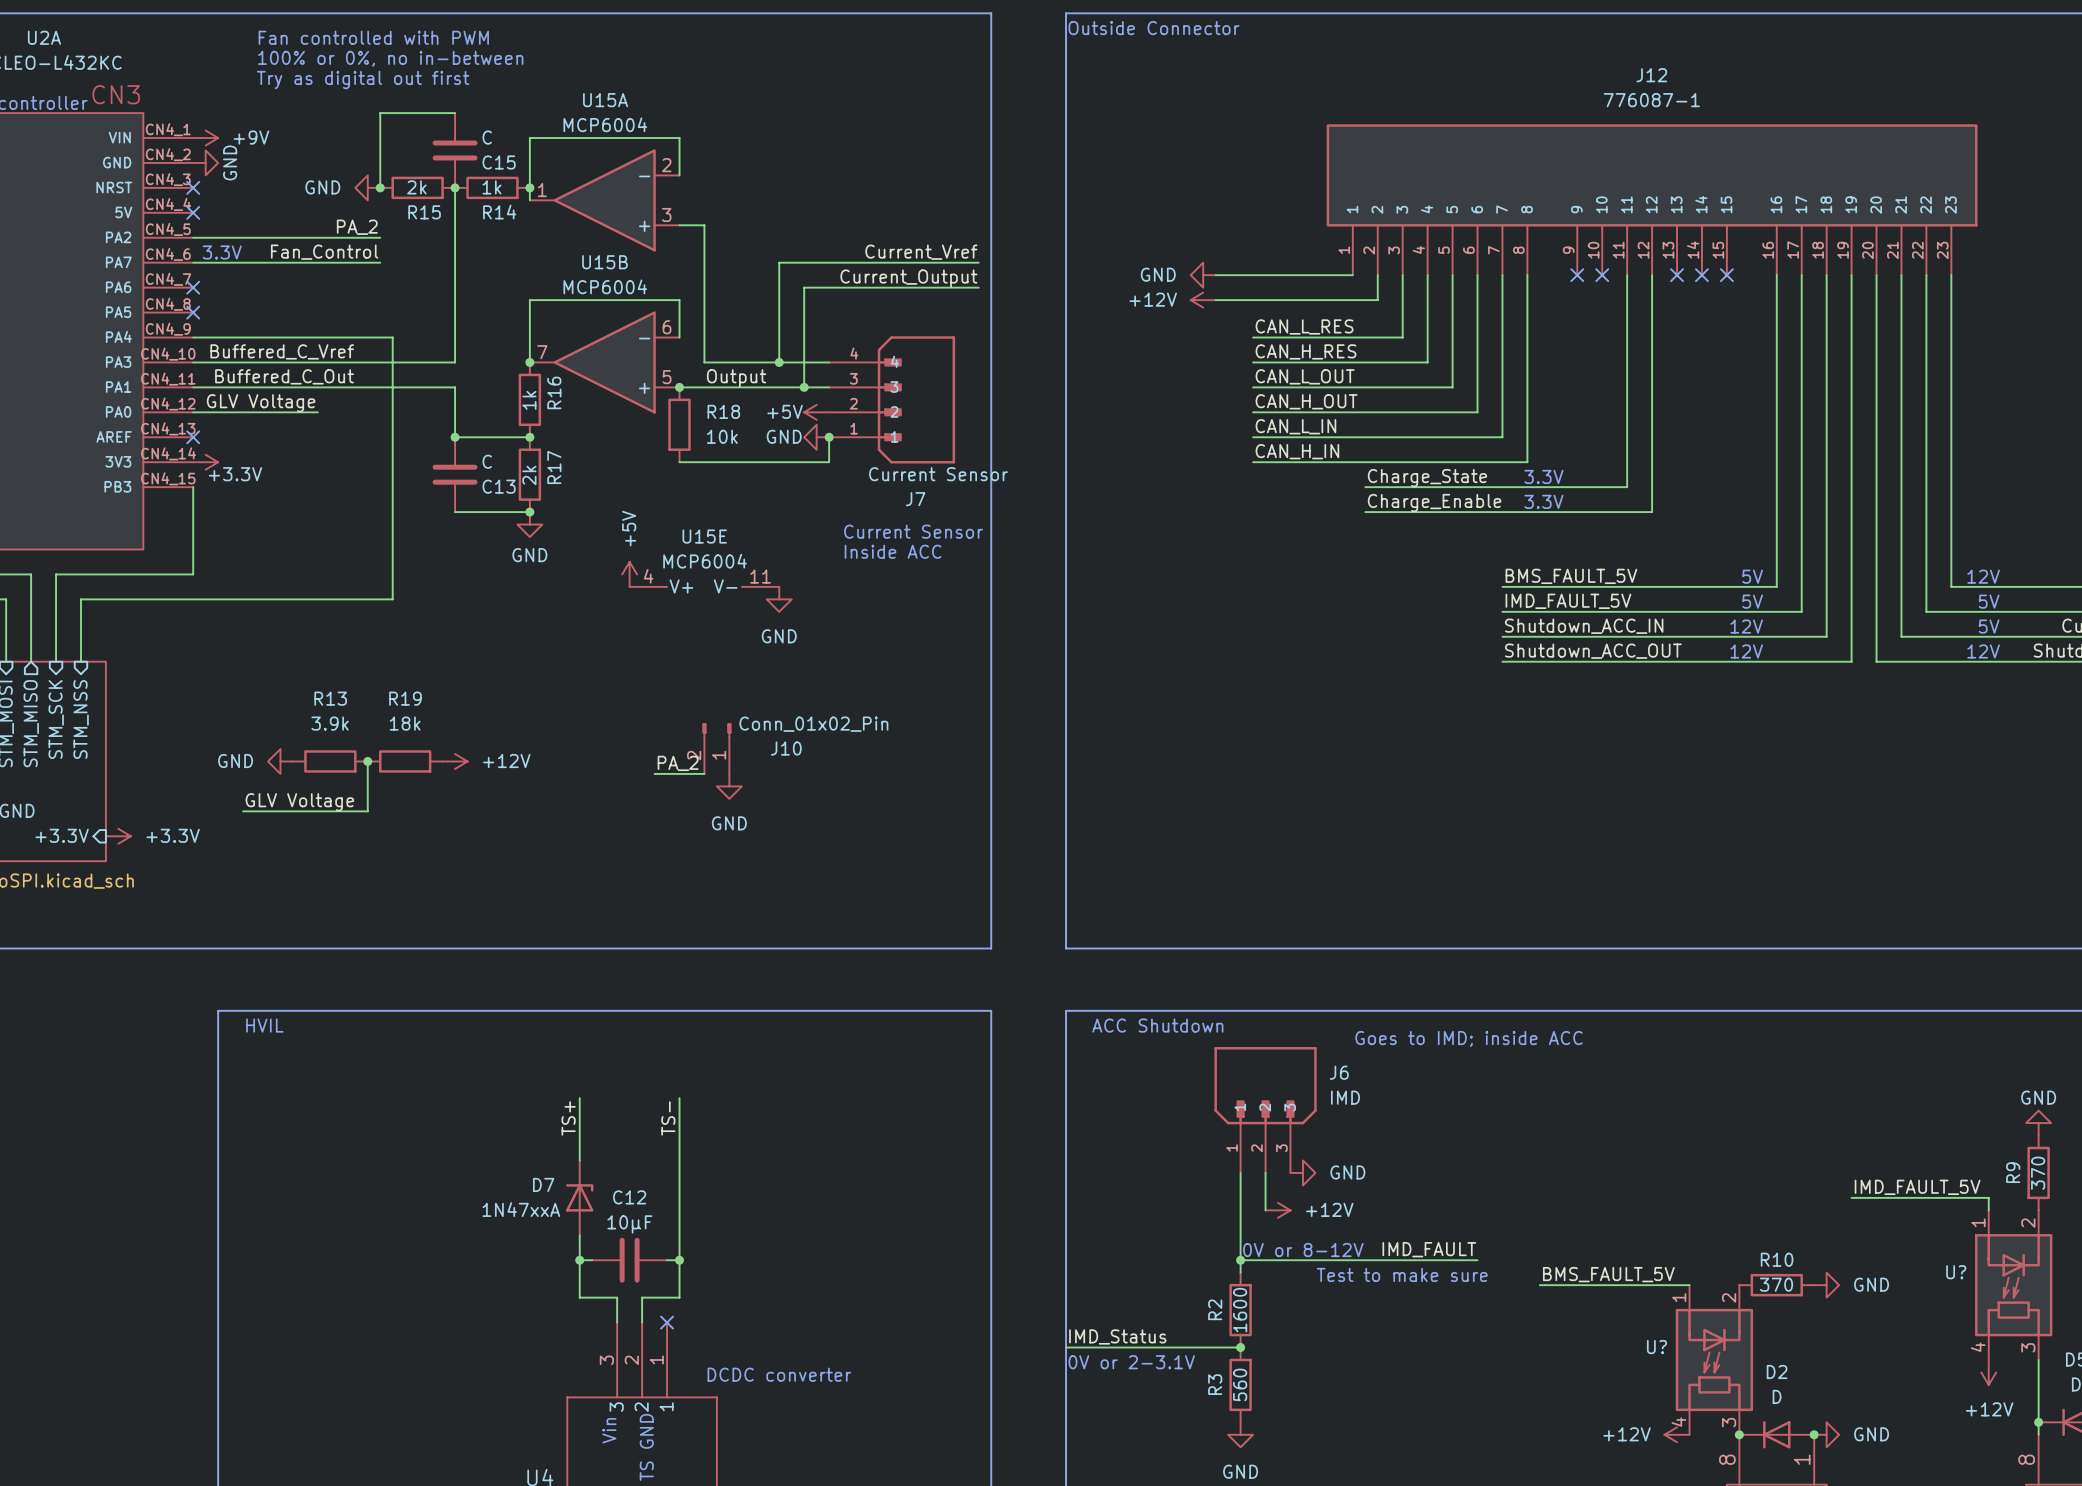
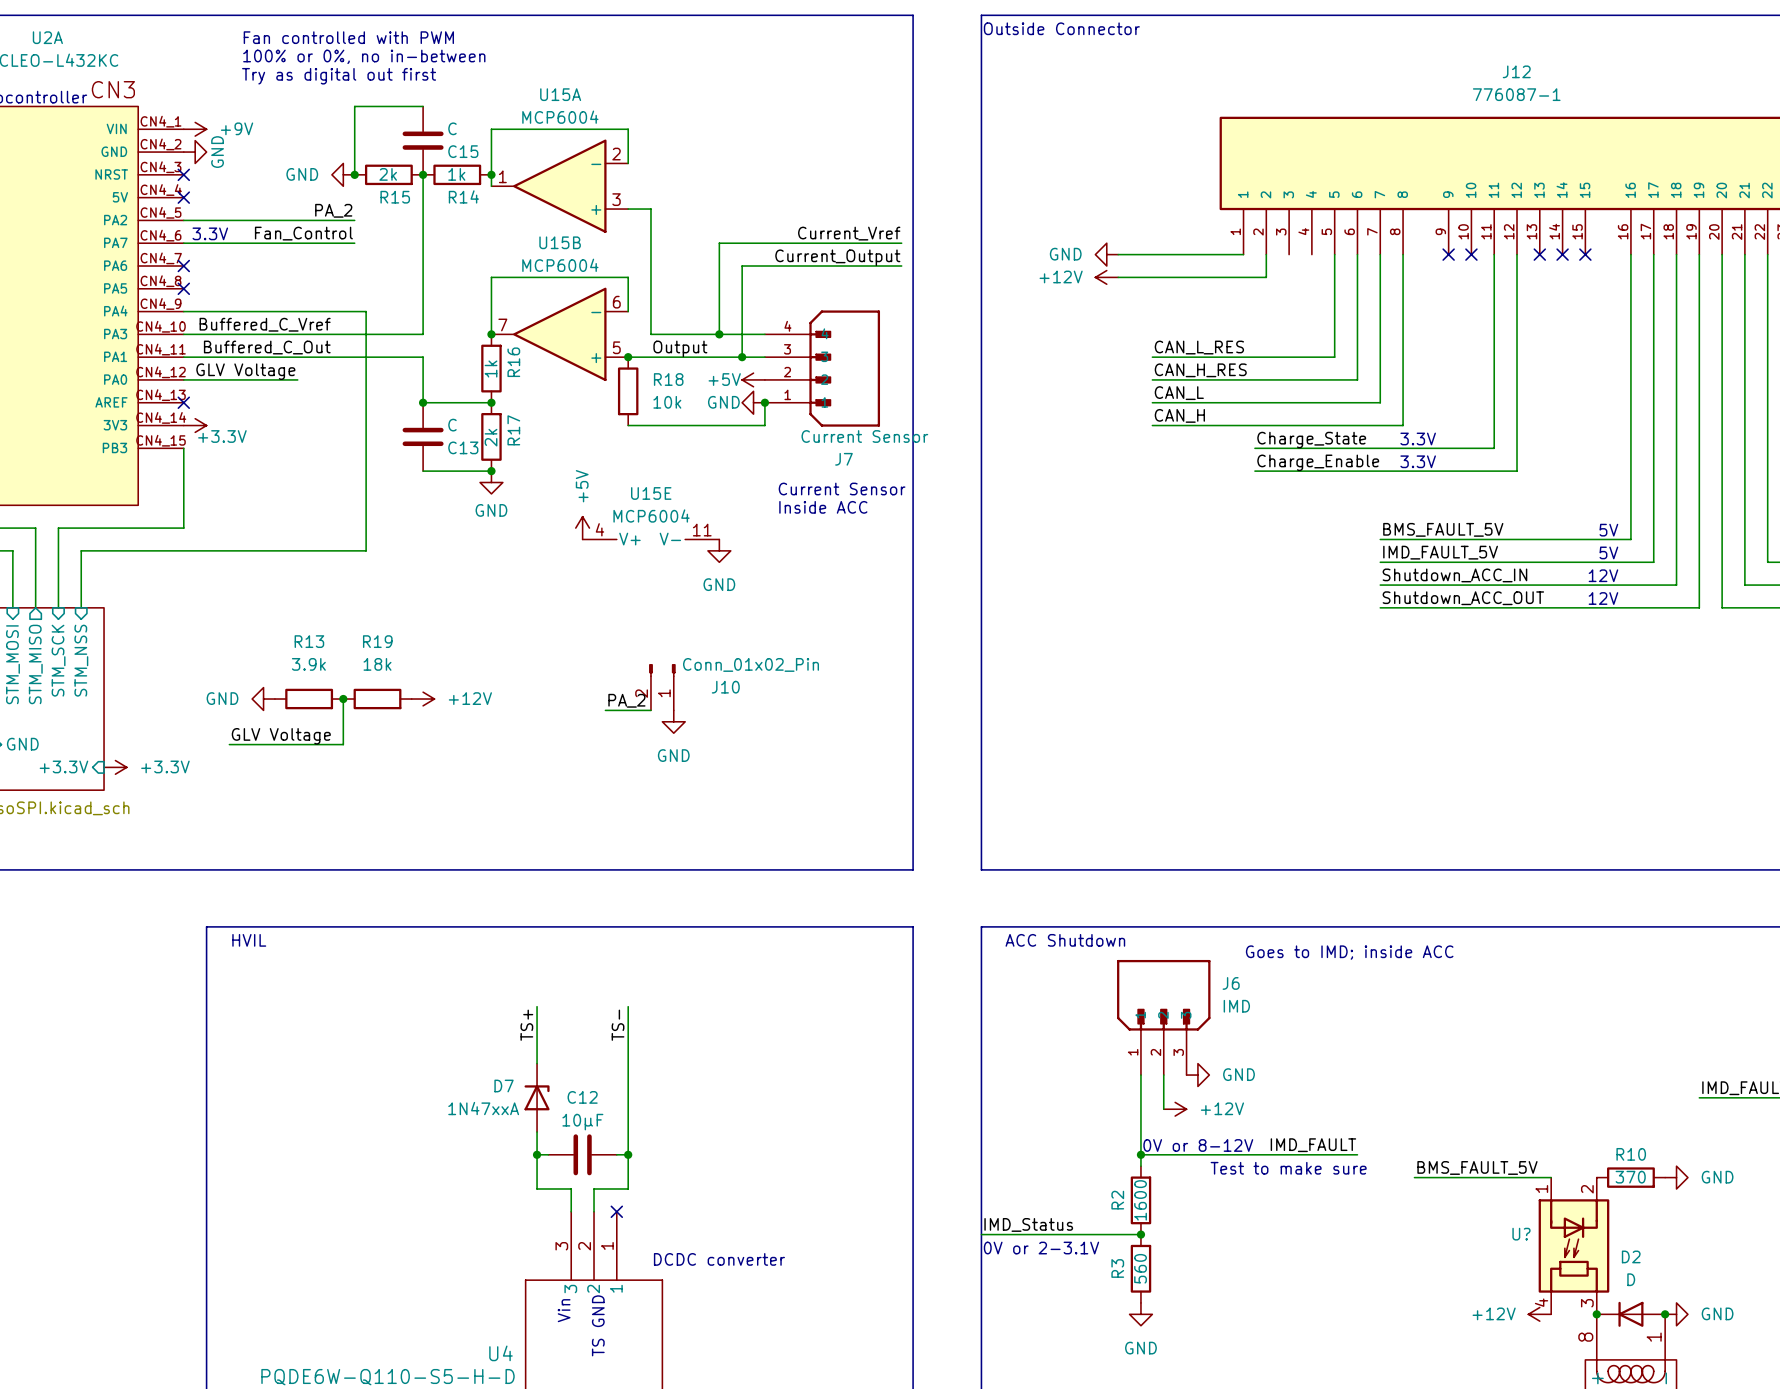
wire: (1402, 275) (1402, 337) (1253, 337) -> none
wire: (1427, 275) (1427, 362) (1253, 362) -> none
label: CAN_L_RES (1304, 326) -> none
label: CAN_H_RES (1306, 351) -> none
label: CAN_L_OUT (1305, 376) -> CAN_L_RES (1199, 347)
label: CAN_H_OUT (1306, 401) -> CAN_H_RES (1200, 370)
label: CAN_L_IN (1295, 426) -> CAN_L (1179, 393)
label: CAN_H_IN (1297, 451) -> CAN_H (1179, 415)

